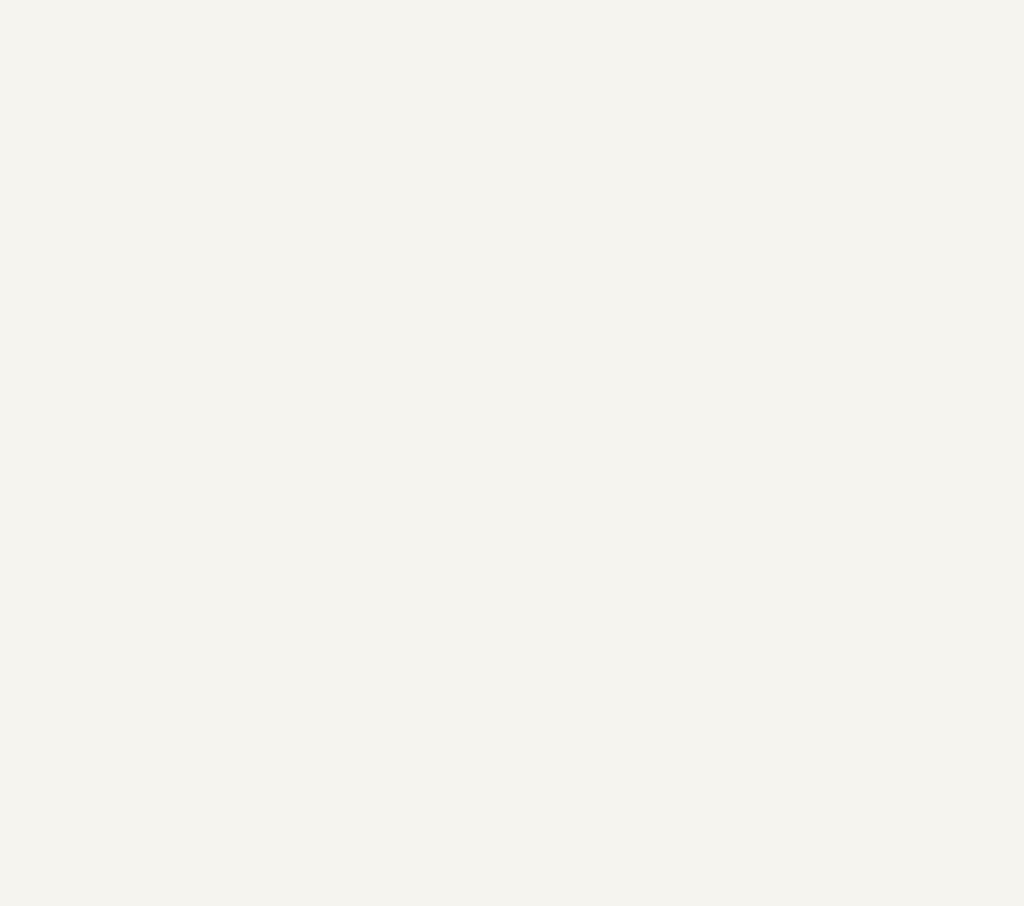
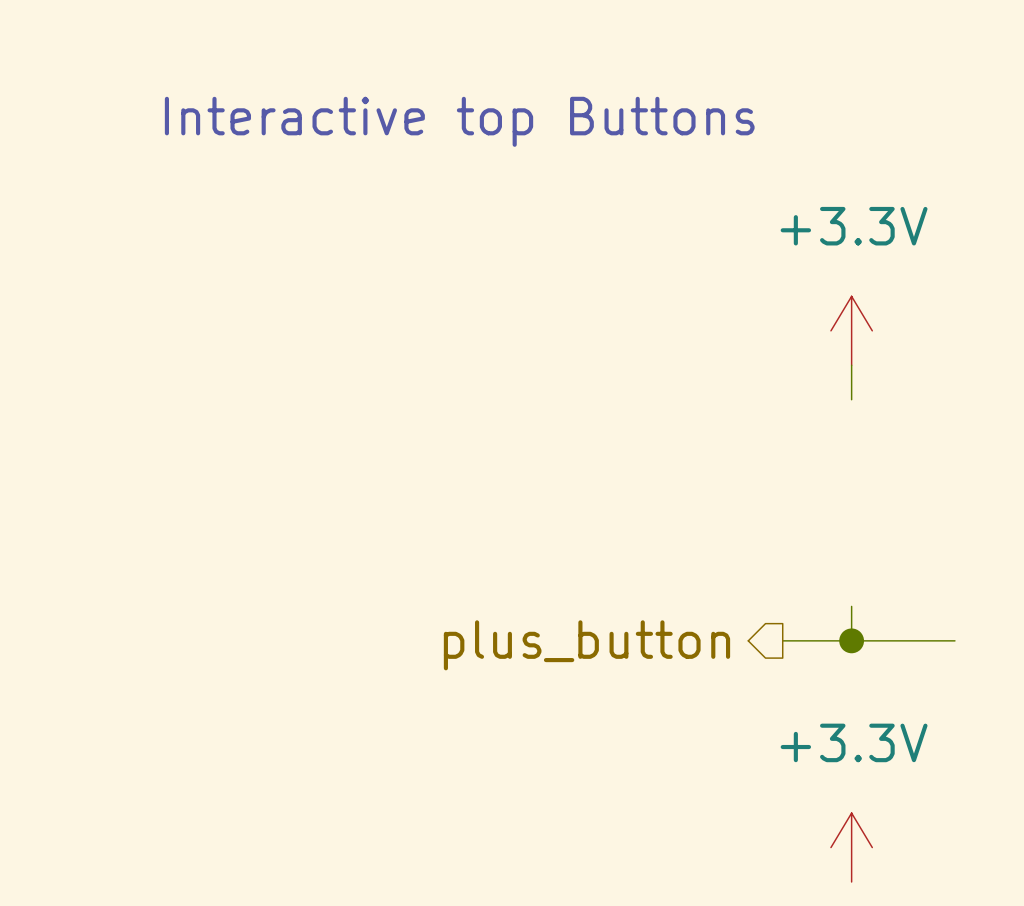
text: none -> Interactive top Buttons (459, 121)
power symbol: none -> +3.3V (851, 330)
wire: none -> (851, 365) (851, 399)
wire: none -> (851, 606) (851, 640)
wire: none -> (782, 640) (954, 640)
junction: none -> (851, 640)
hierarchical label: none -> plus_button (586, 645)
power symbol: none -> +3.3V (851, 847)

